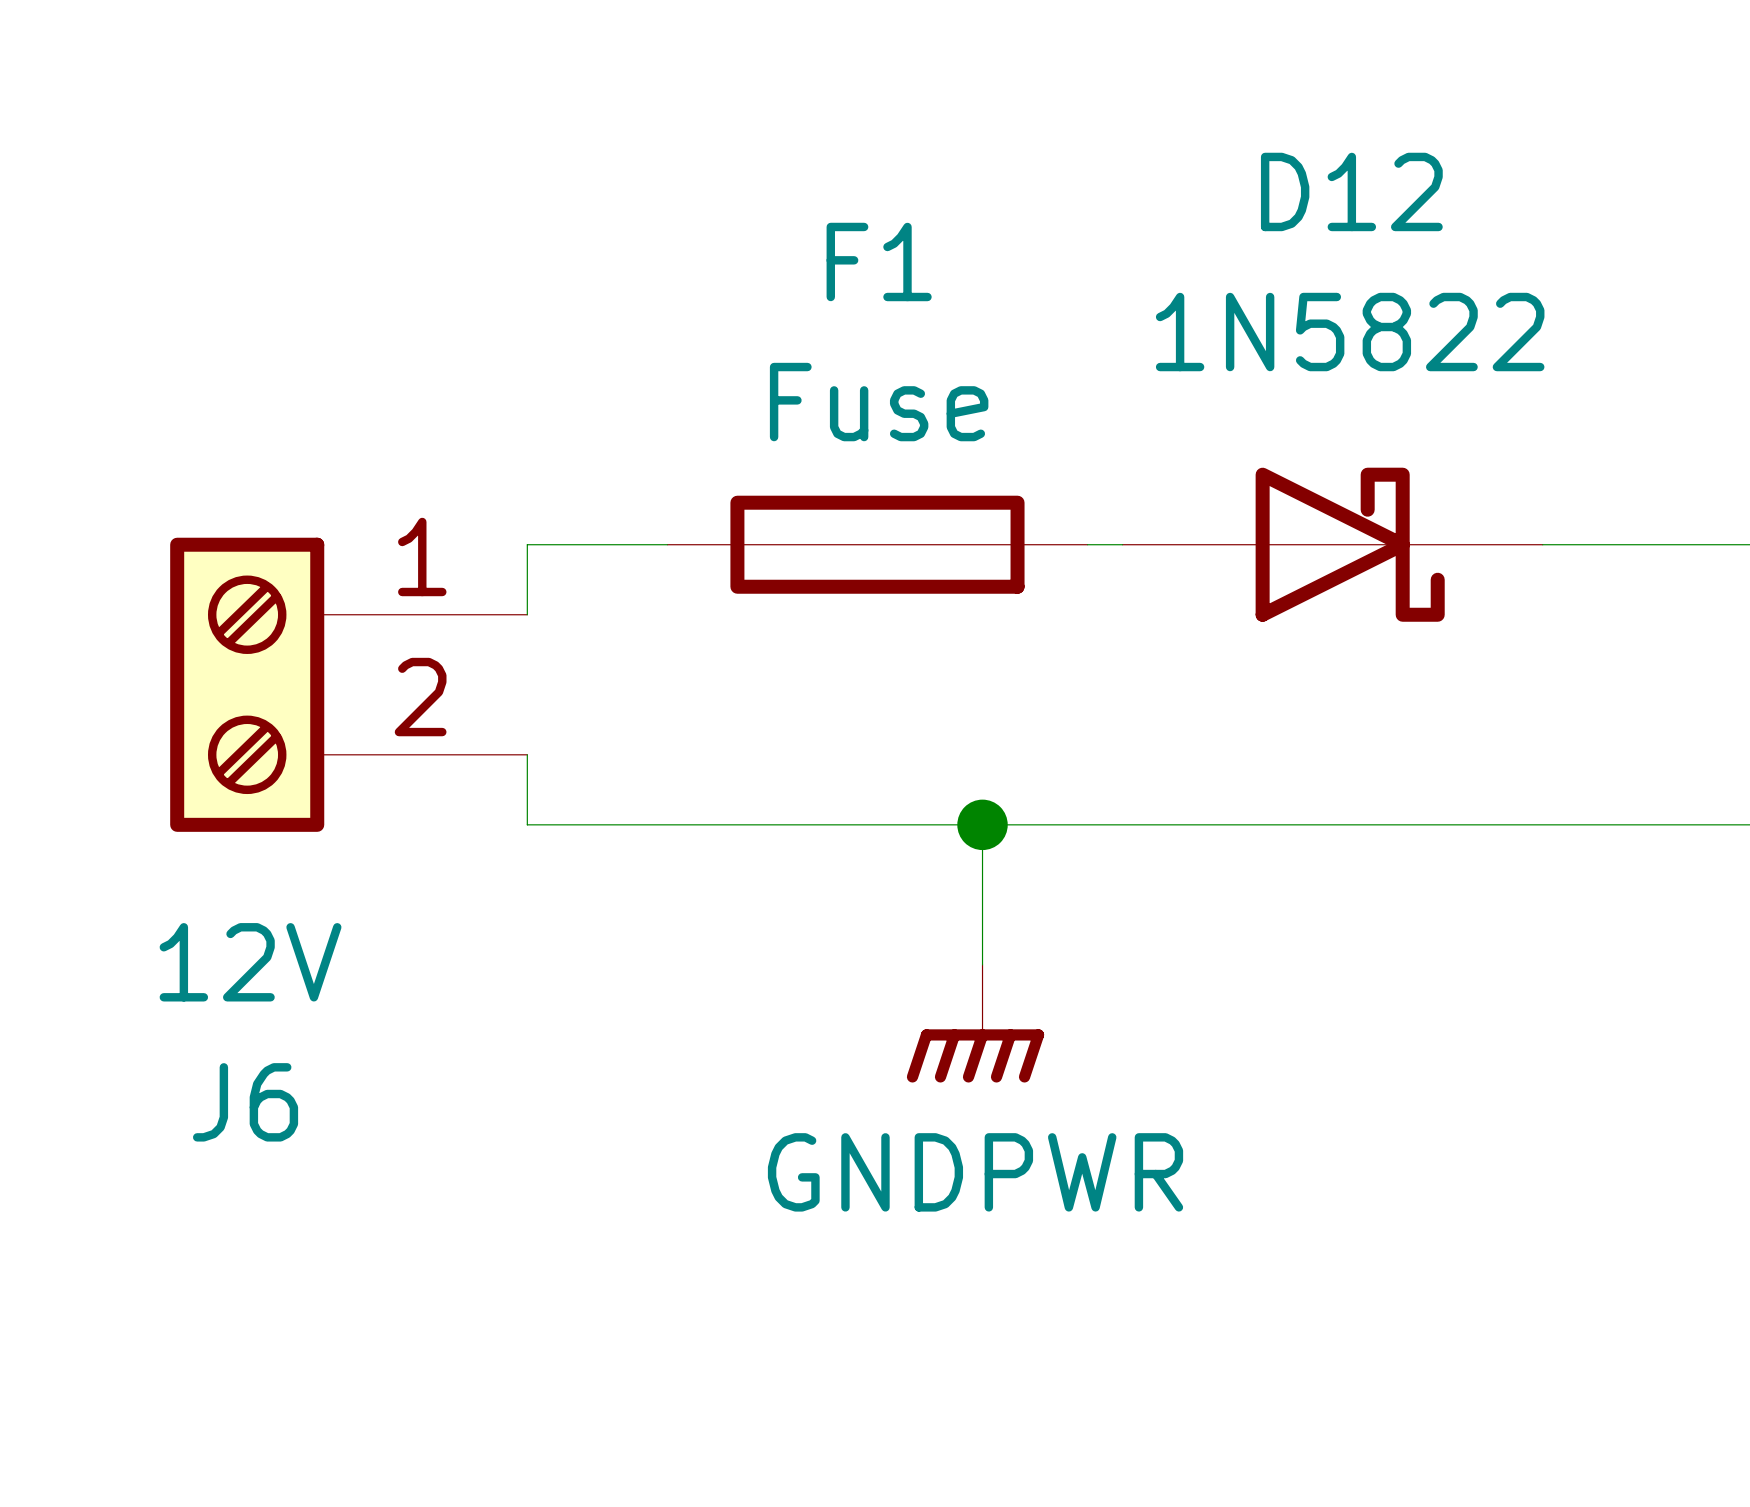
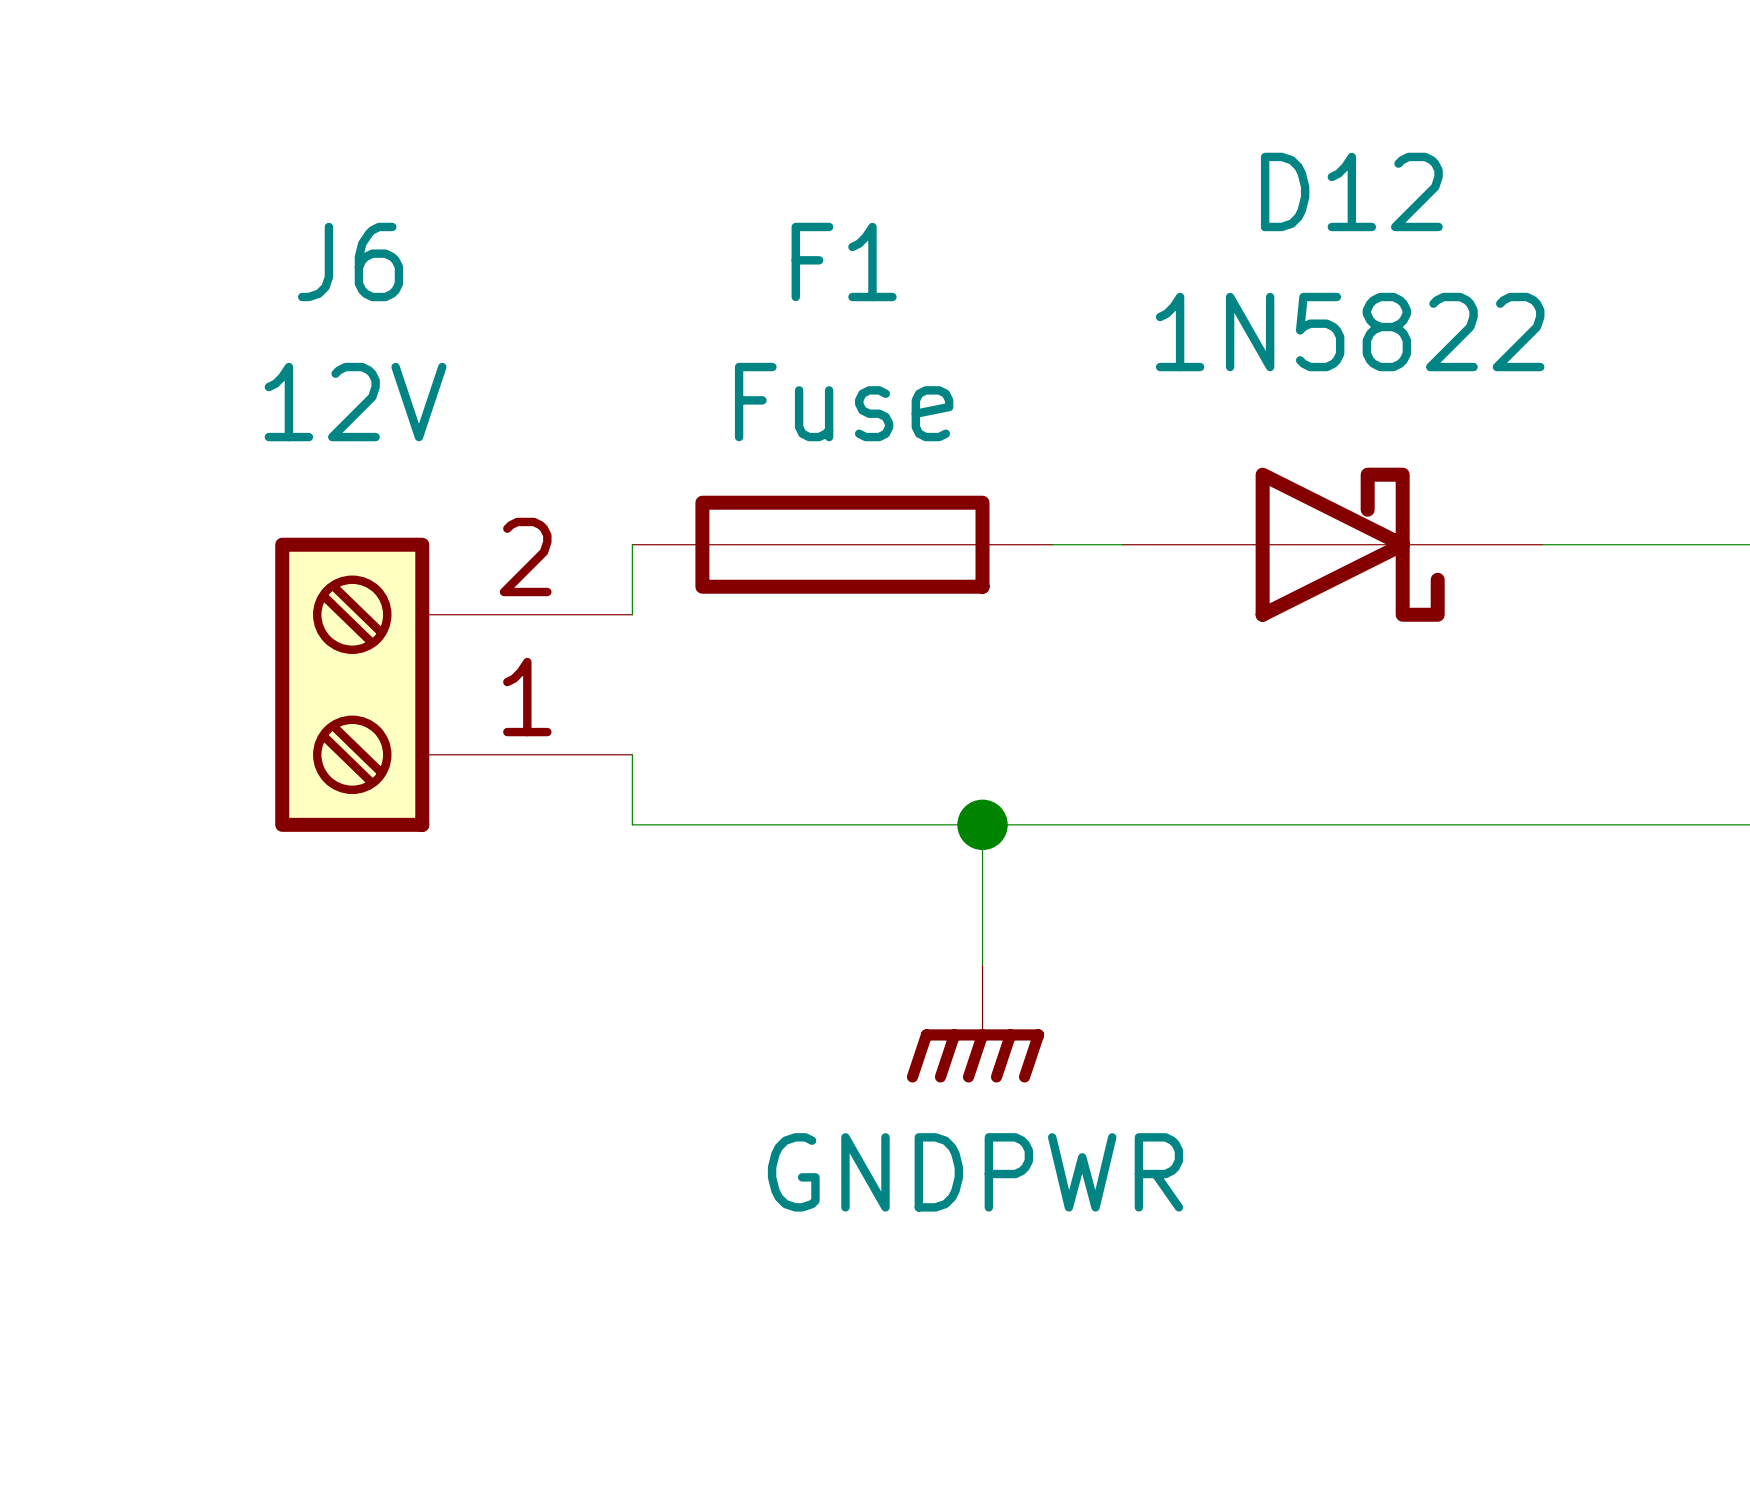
wire: none -> (632, 544) (632, 614)
wire: (667, 544) (527, 544) (527, 614) -> none
F1 position: (877, 544) -> (842, 544)
J6 flip: as is (247, 684) -> up-down (352, 684)
wire: (527, 754) (527, 824) (632, 824) -> (632, 754) (632, 824)

